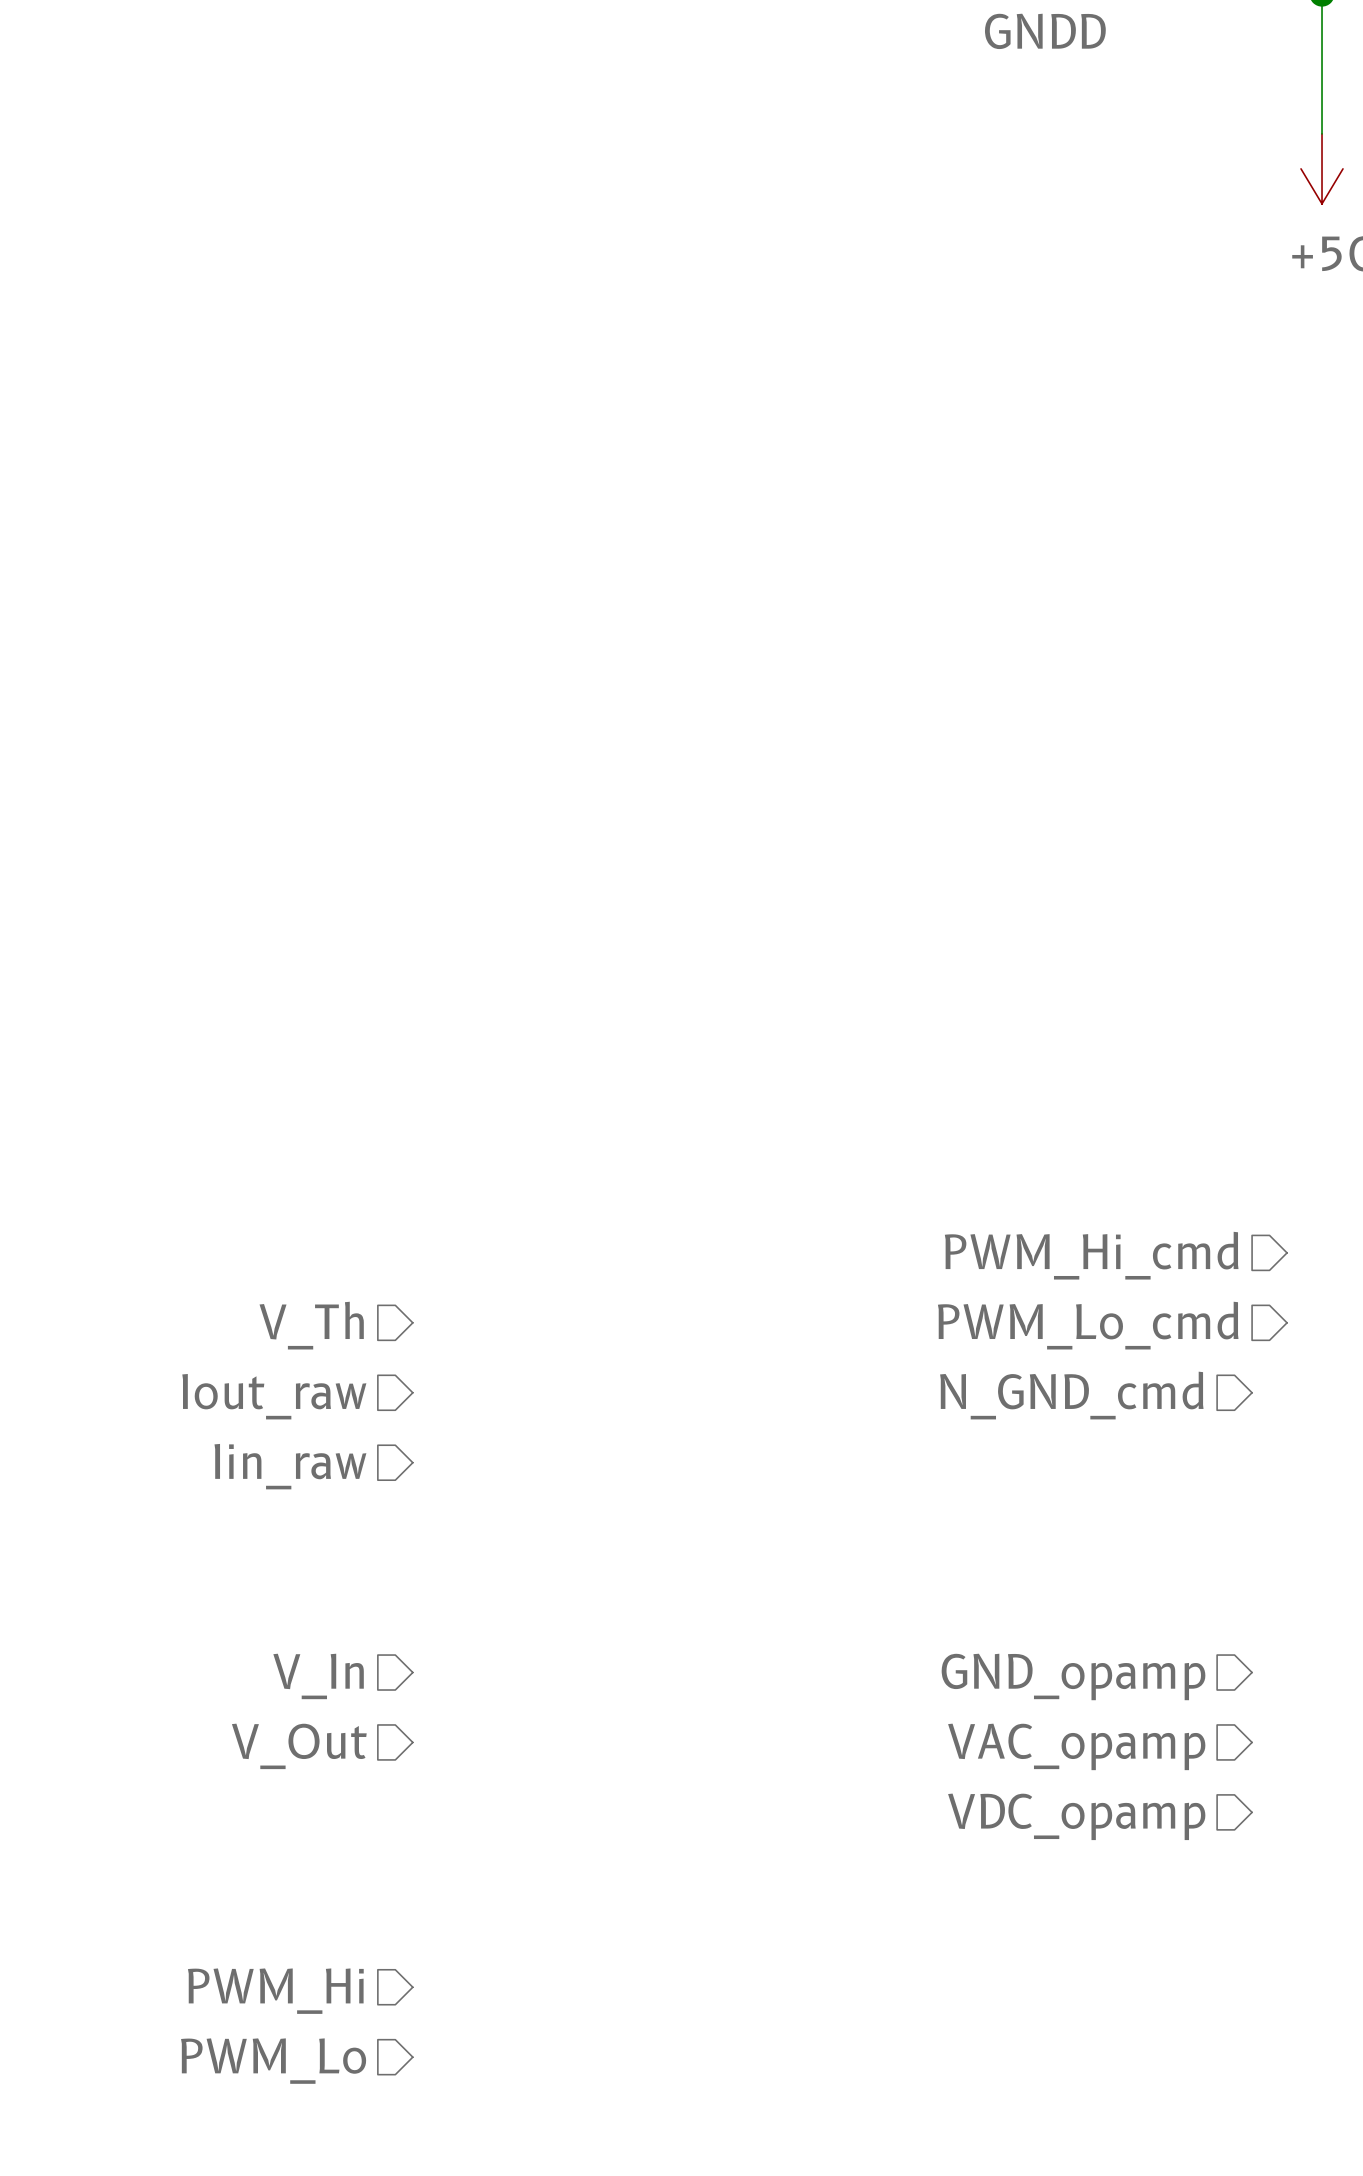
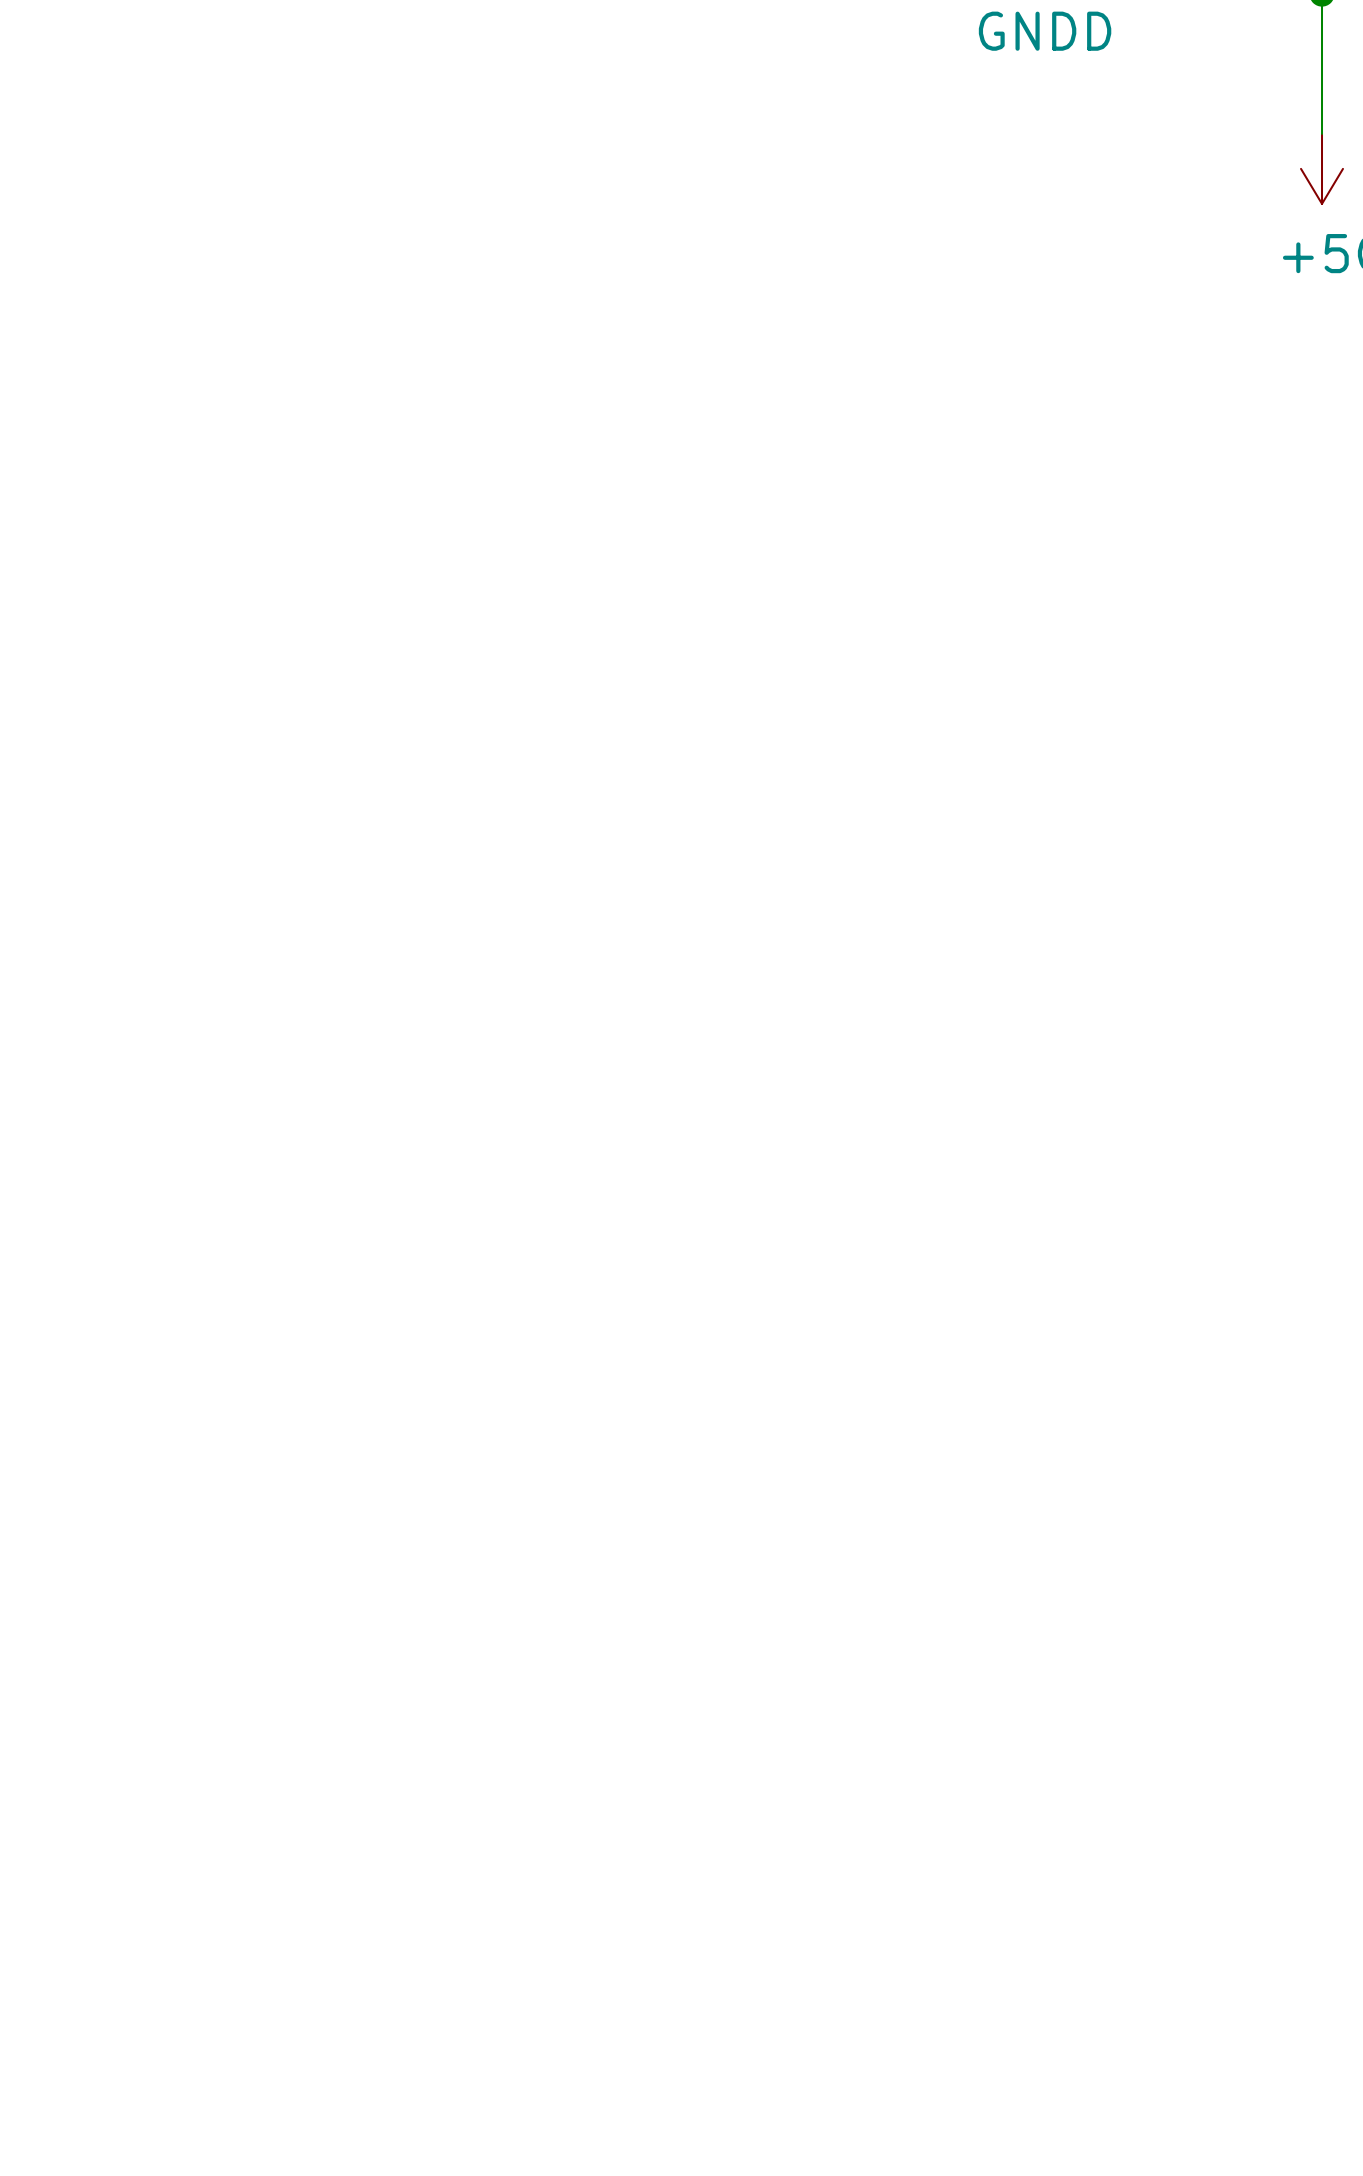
hierarchical label: PWM_Hi_cmd (1091, 1255) -> none
hierarchical label: V_Th (311, 1325) -> none
hierarchical label: PWM_Lo_cmd (1088, 1325) -> none
hierarchical label: N_GND_cmd (1071, 1395) -> none
hierarchical label: Iout_raw (274, 1396) -> none
hierarchical label: Iin_raw (290, 1466) -> none
hierarchical label: V_In (318, 1676) -> none
hierarchical label: GND_opamp (1073, 1676) -> none
hierarchical label: V_Out (299, 1746) -> none
hierarchical label: VAC_opamp (1076, 1746) -> none
hierarchical label: VDC_opamp (1076, 1816) -> none
hierarchical label: PWM_Hi (275, 1991) -> none
hierarchical label: PWM_Lo (273, 2061) -> none

